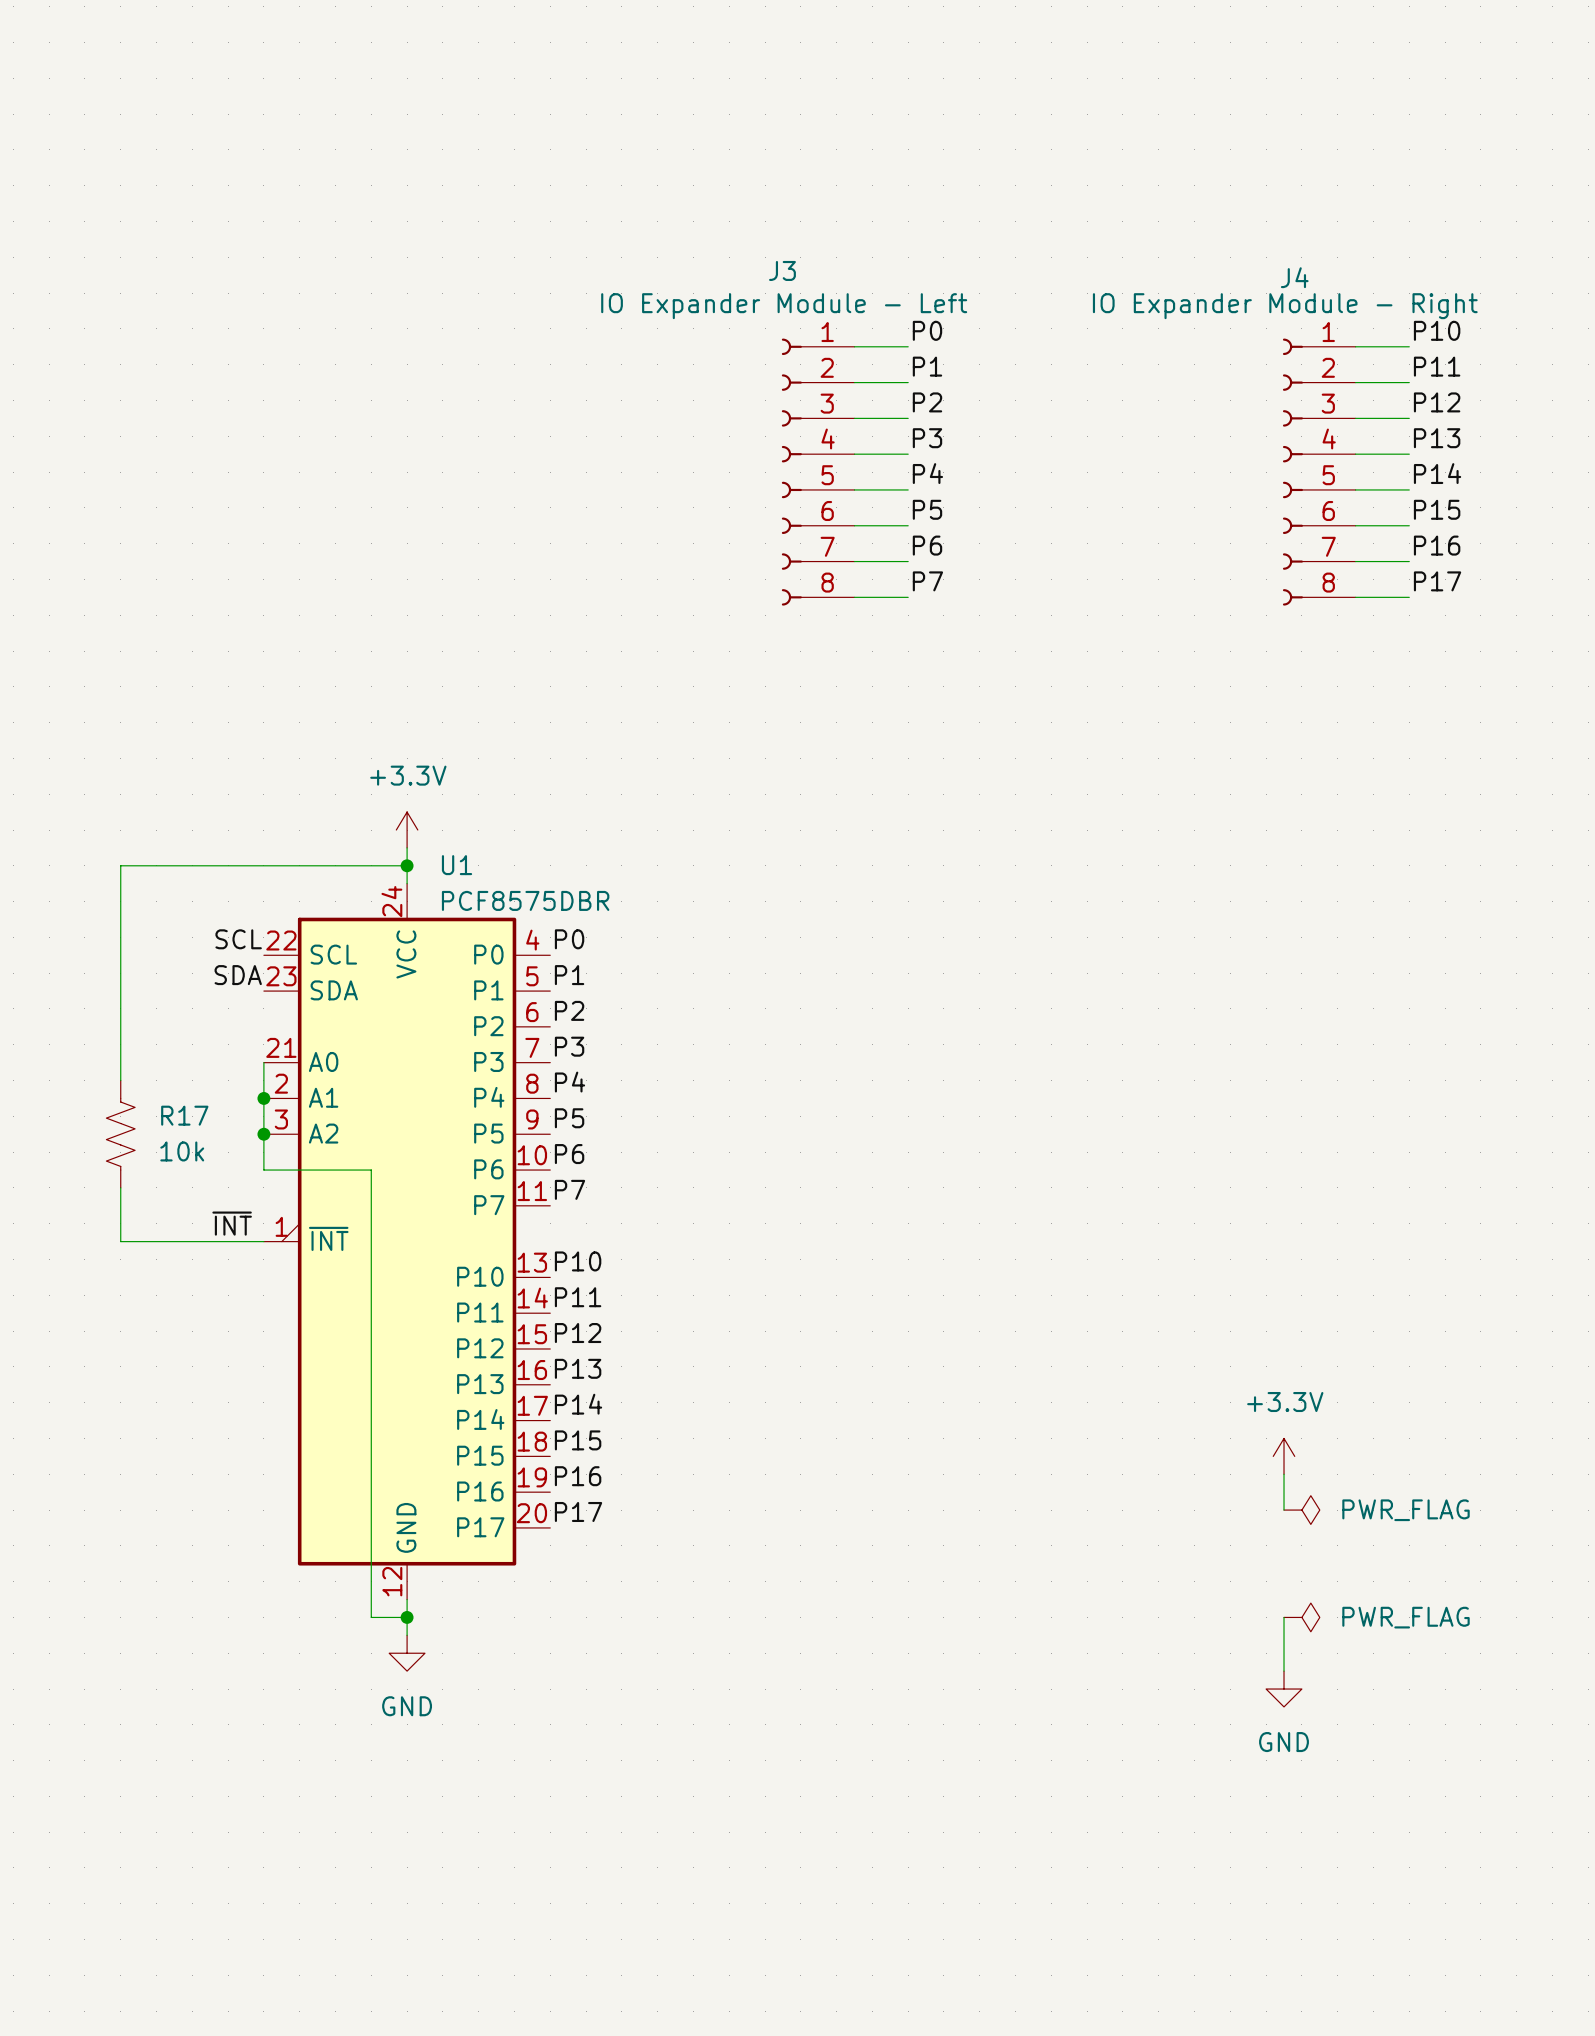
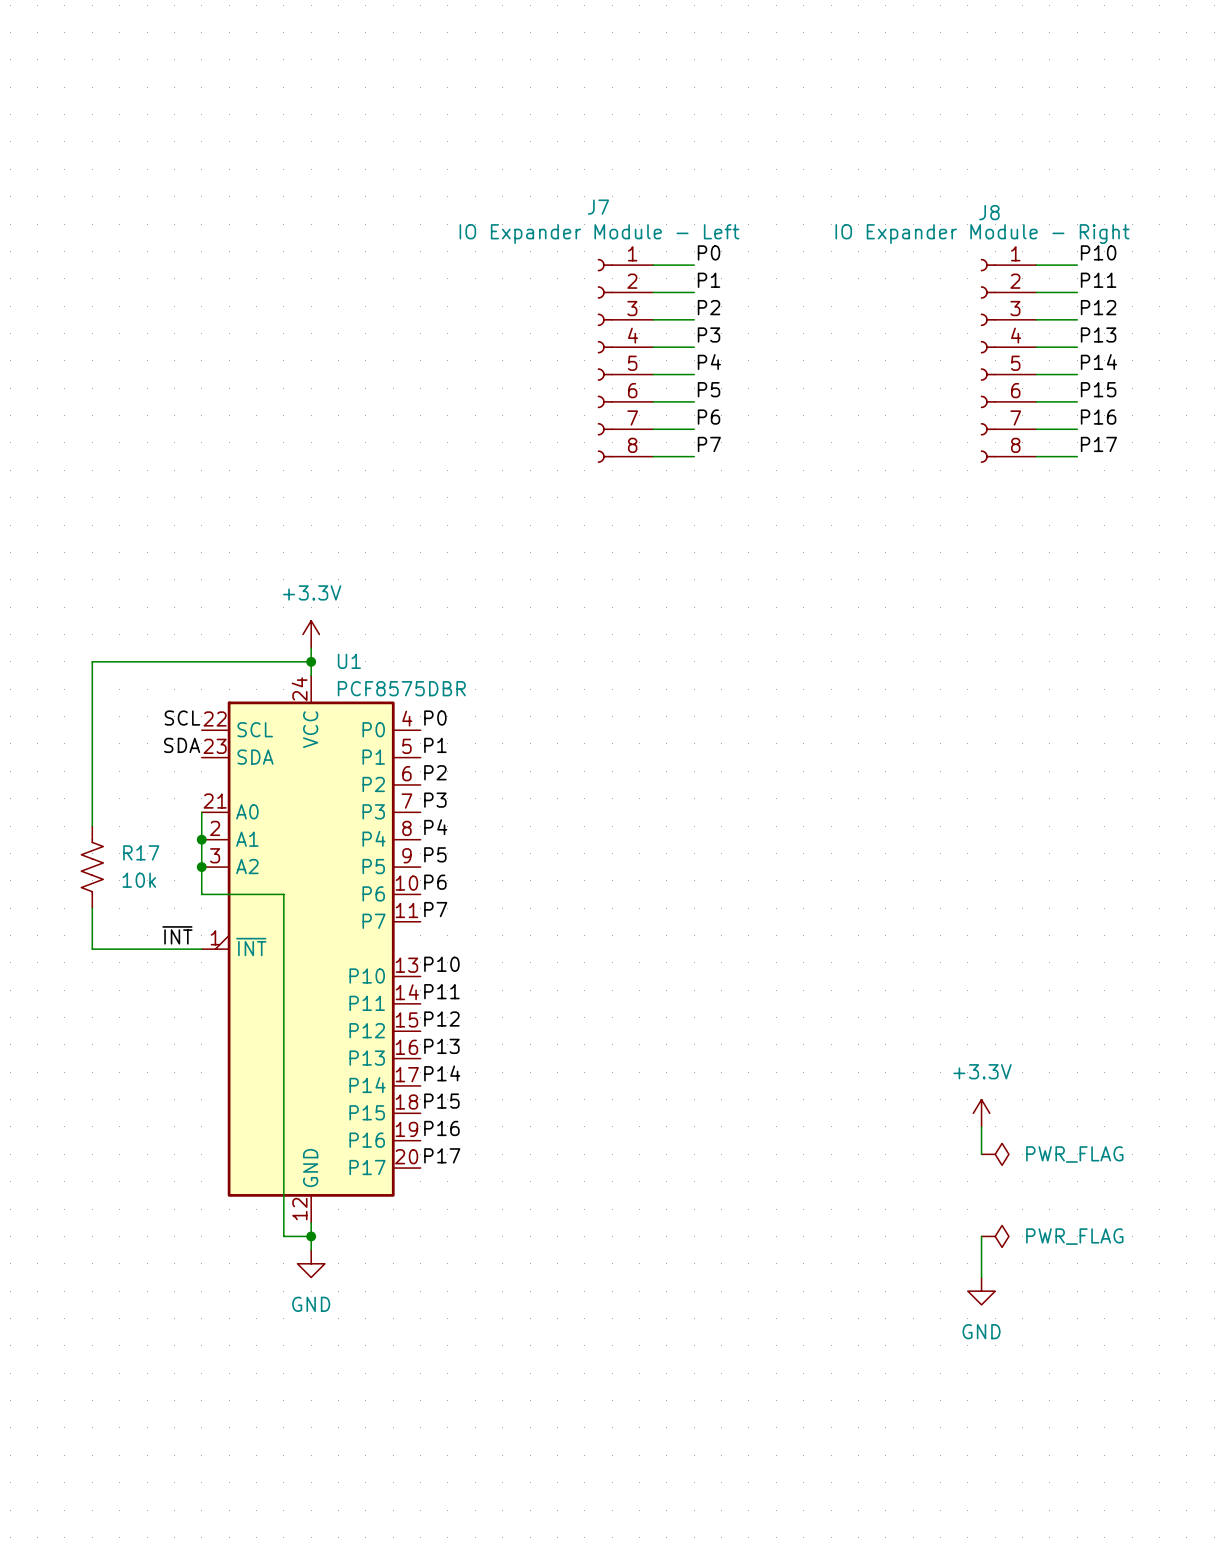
J3 name: J3 (782, 270) -> J7 (598, 207)
J4 name: J4 (1294, 277) -> J8 (989, 212)

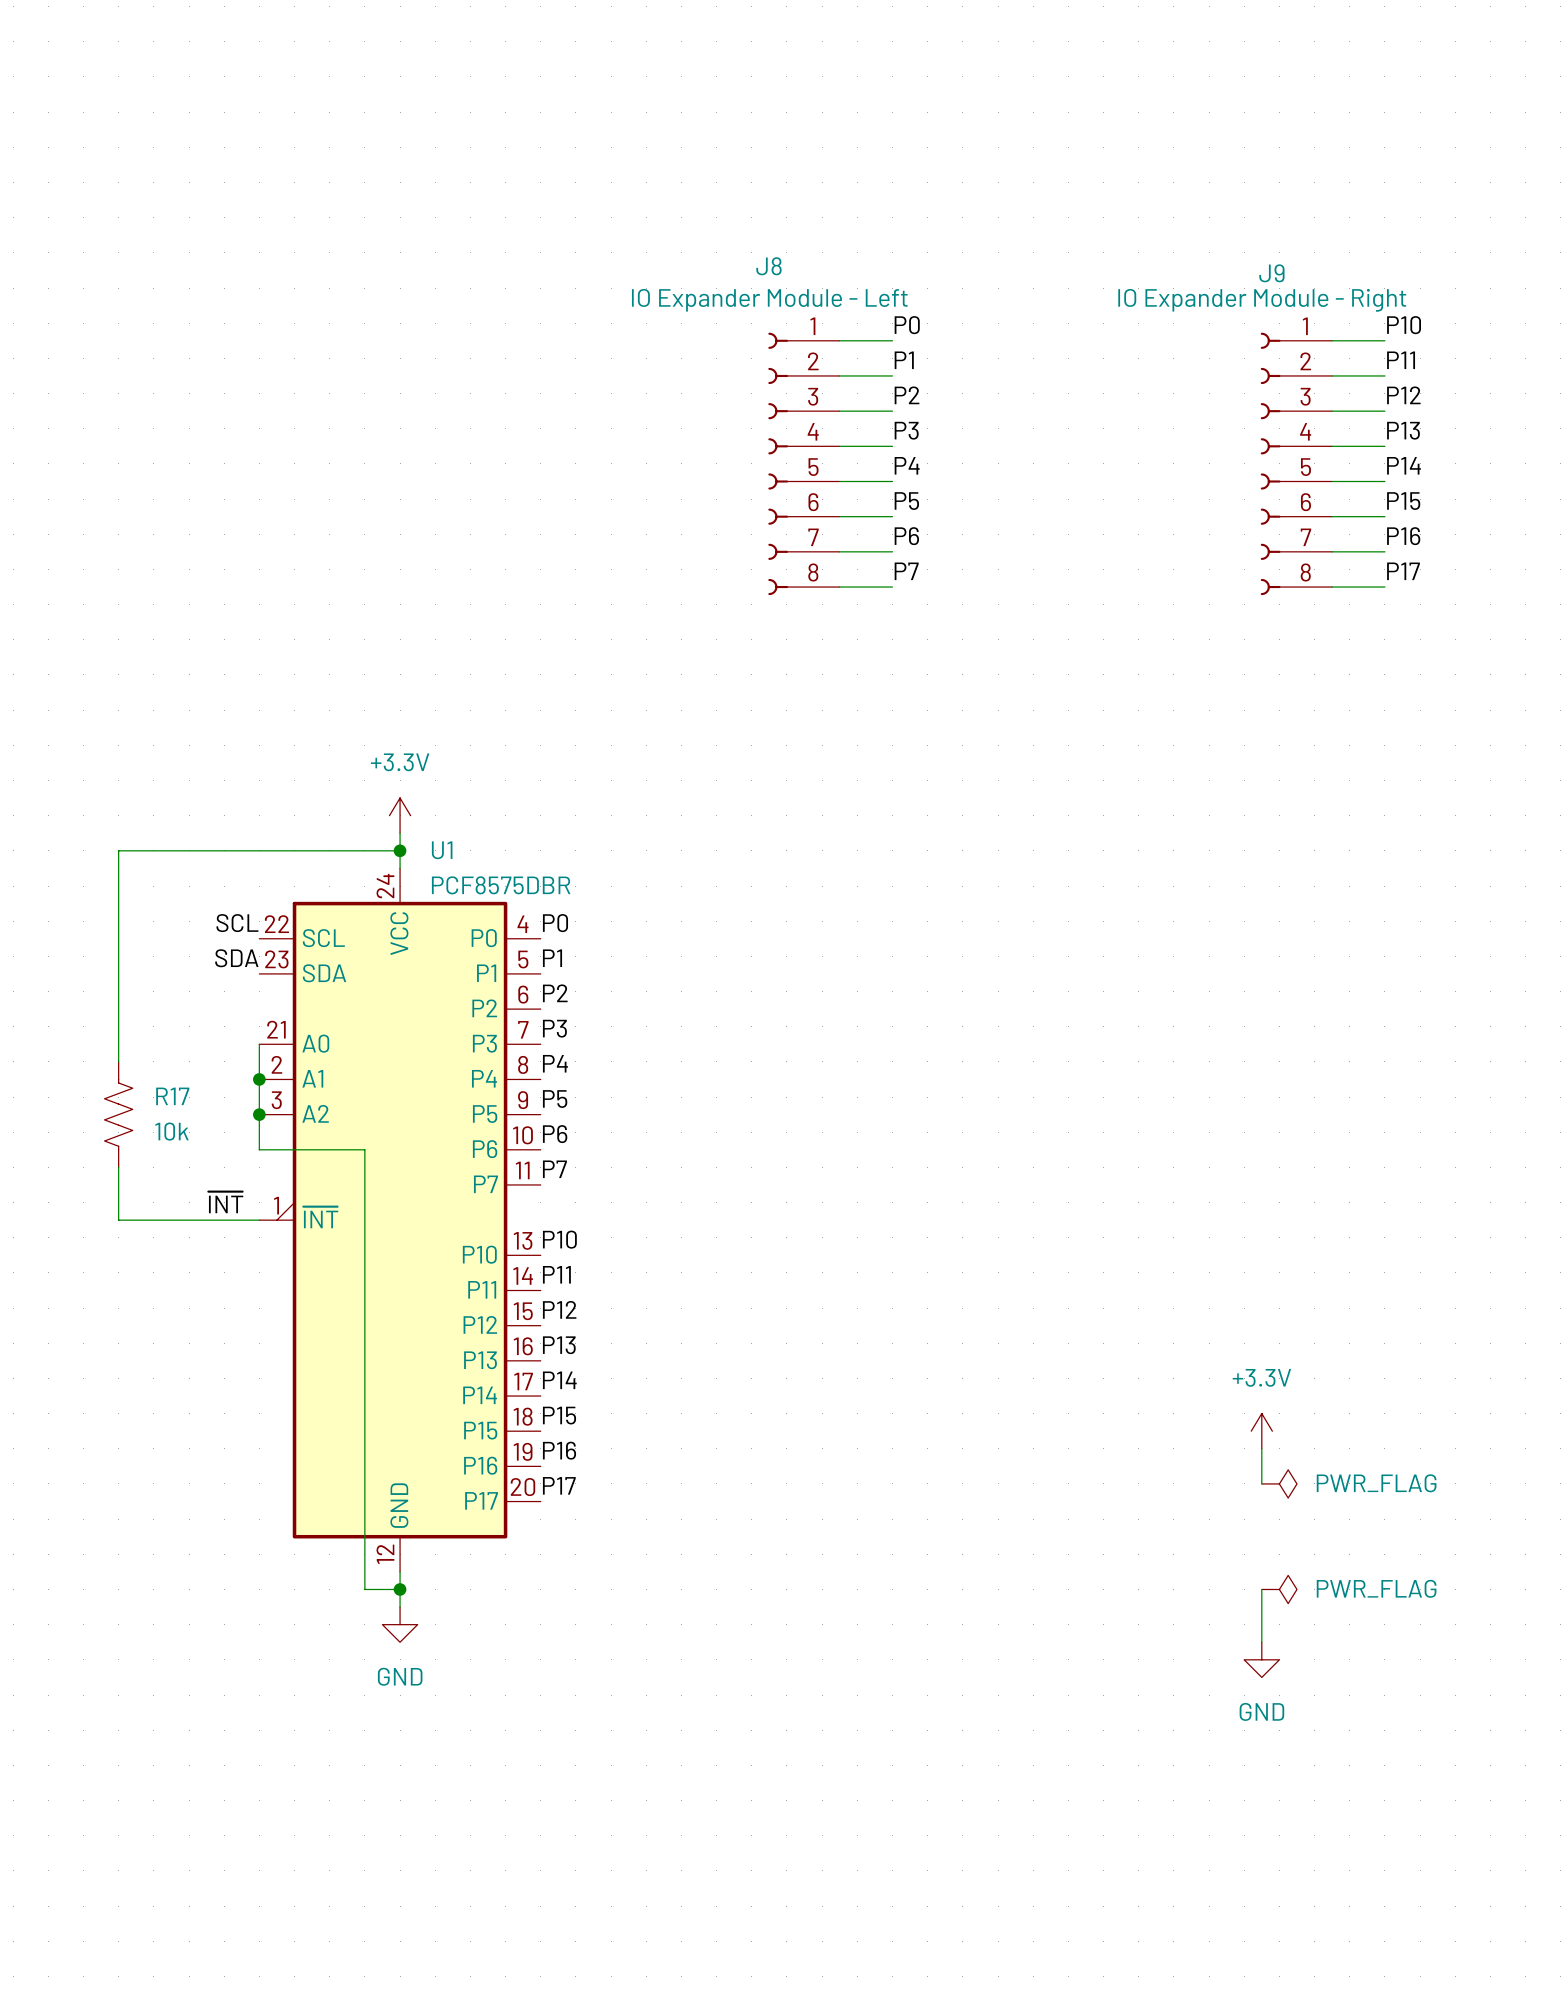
J7 name: J7 (598, 207) -> J8 (768, 266)
J8 name: J8 (989, 212) -> J9 (1271, 273)

